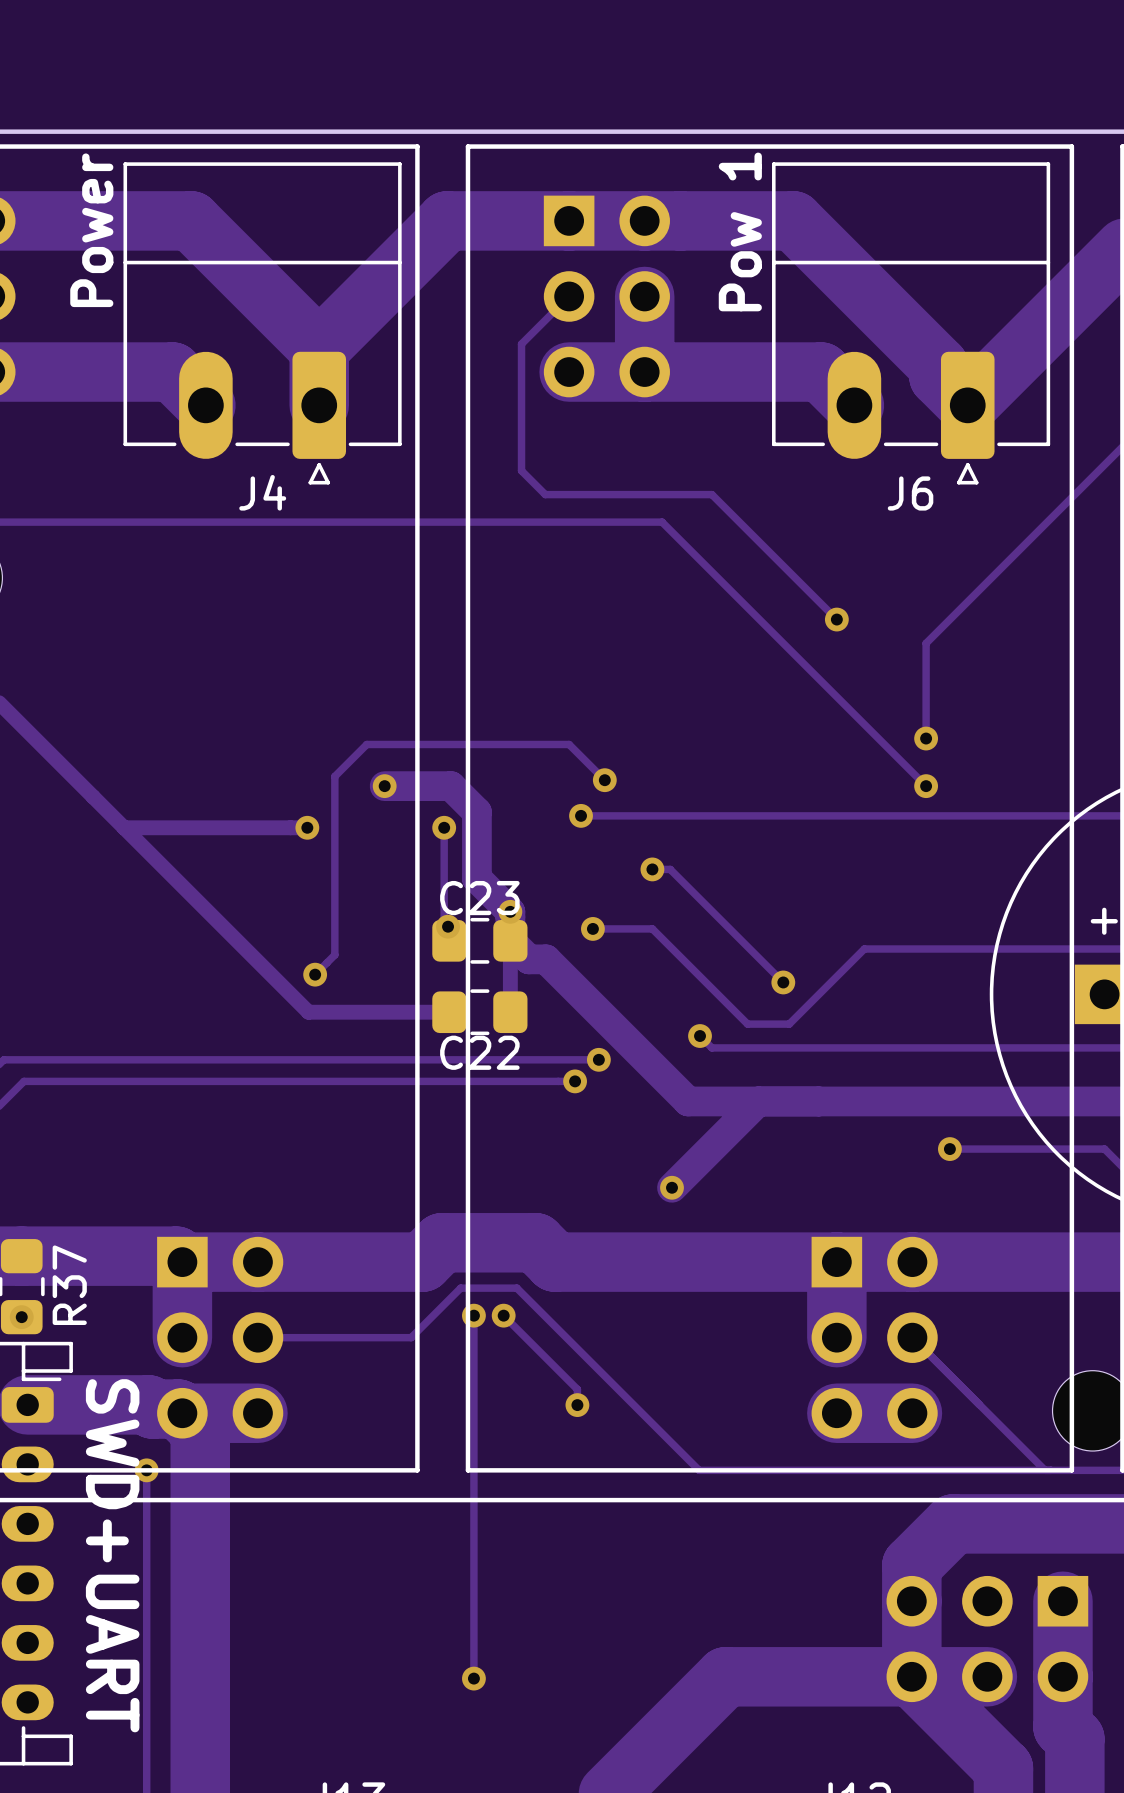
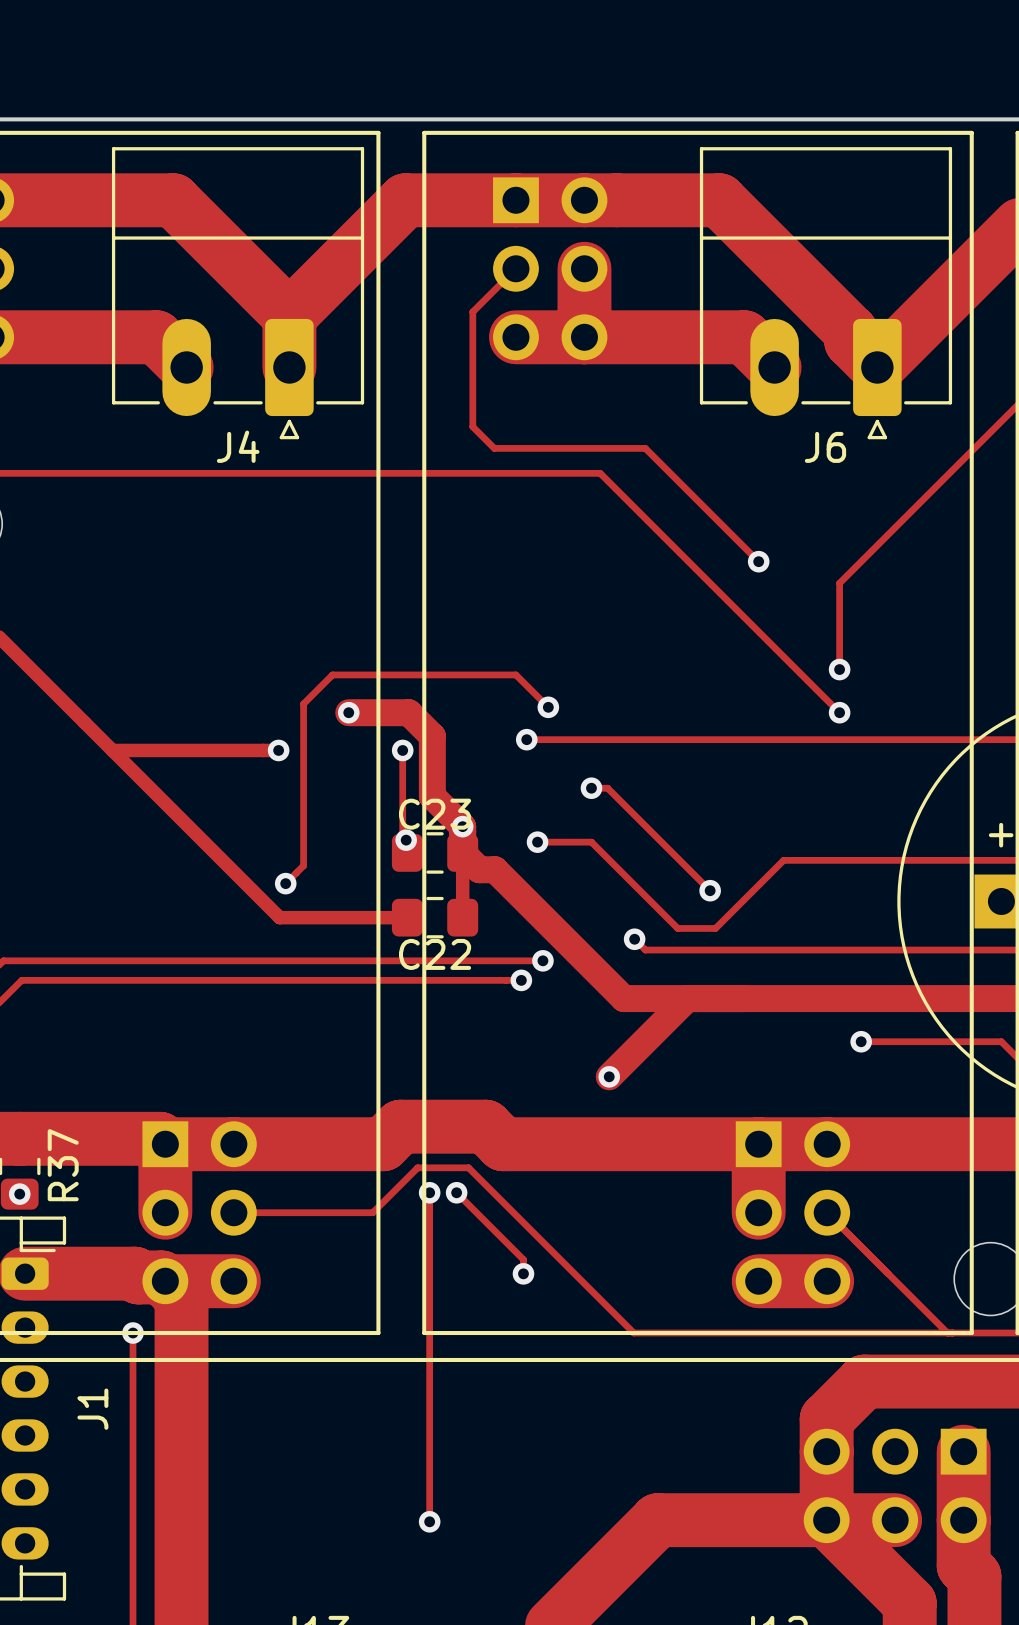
text: Power (91, 230) -> none
text: Pow 1 (740, 231) -> none
J1 name: none -> J1 (92, 1409)
text: SWD+UART (112, 1555) -> none

